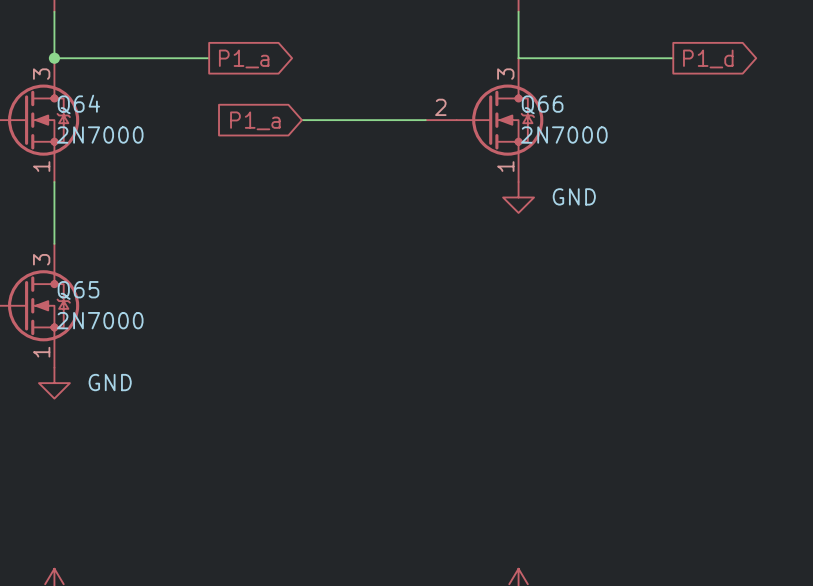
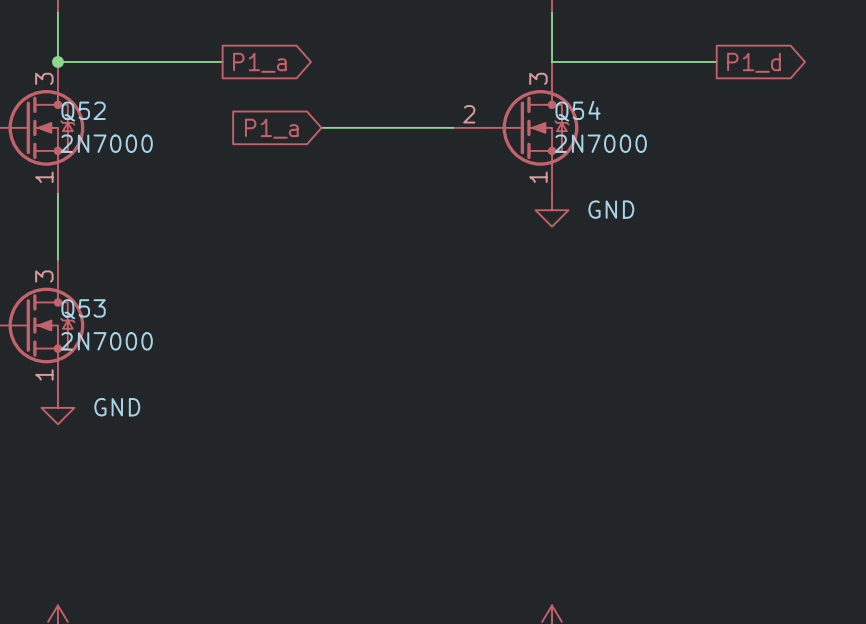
Q64 name: Q64 (78, 104) -> Q52 (83, 111)
Q66 name: Q66 (542, 104) -> Q54 (578, 111)
Q65 name: Q65 (78, 290) -> Q53 (83, 309)

